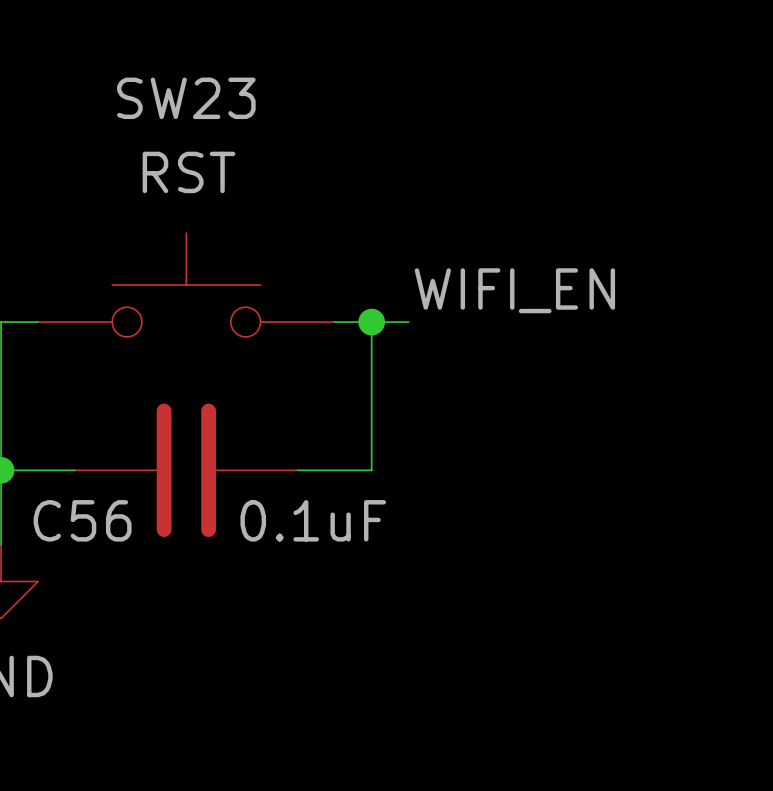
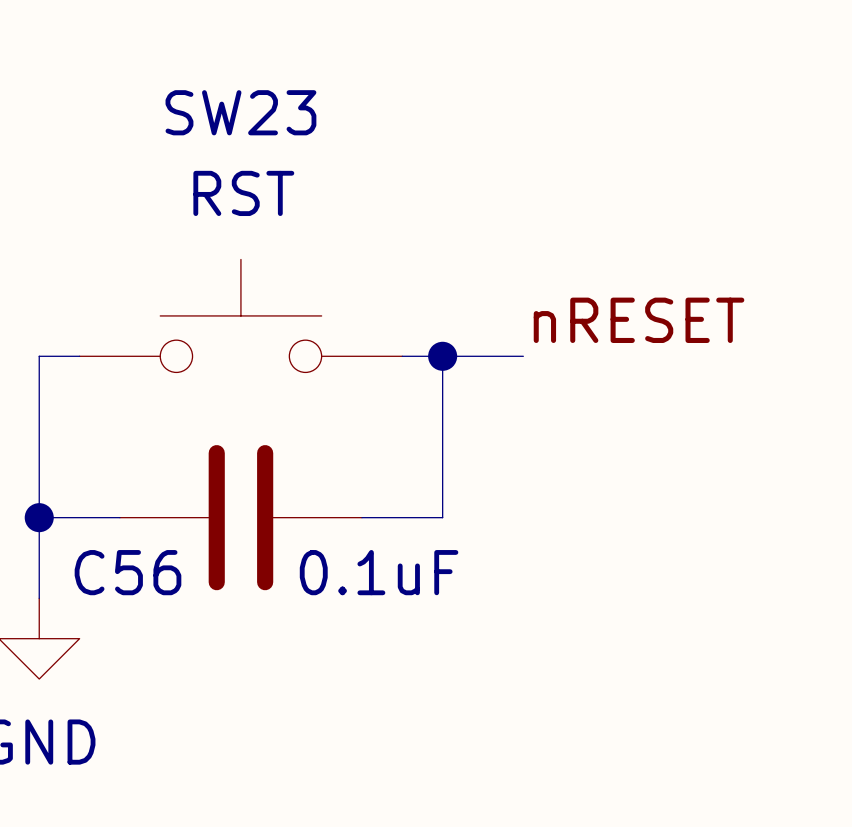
label: none -> nRESET (639, 320)
label: WIFI_EN (514, 290) -> none
wire: none -> (482, 356) (523, 356)

